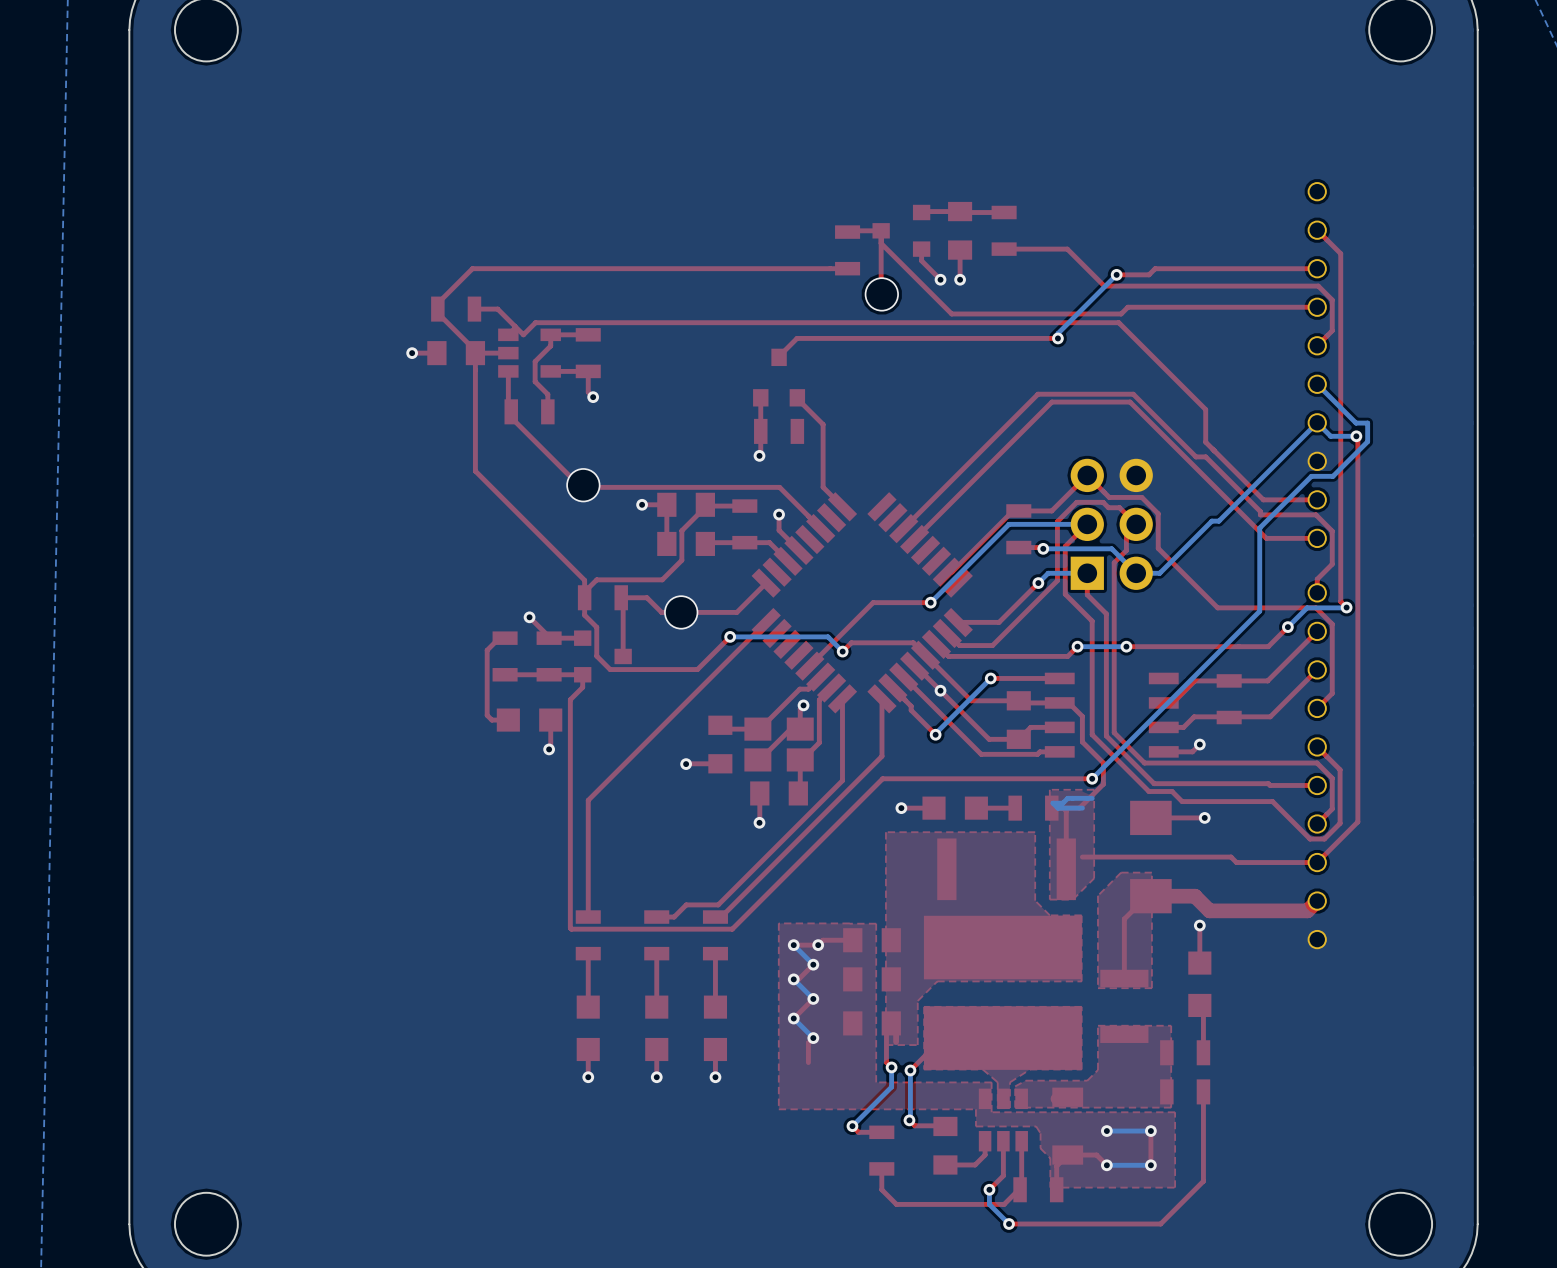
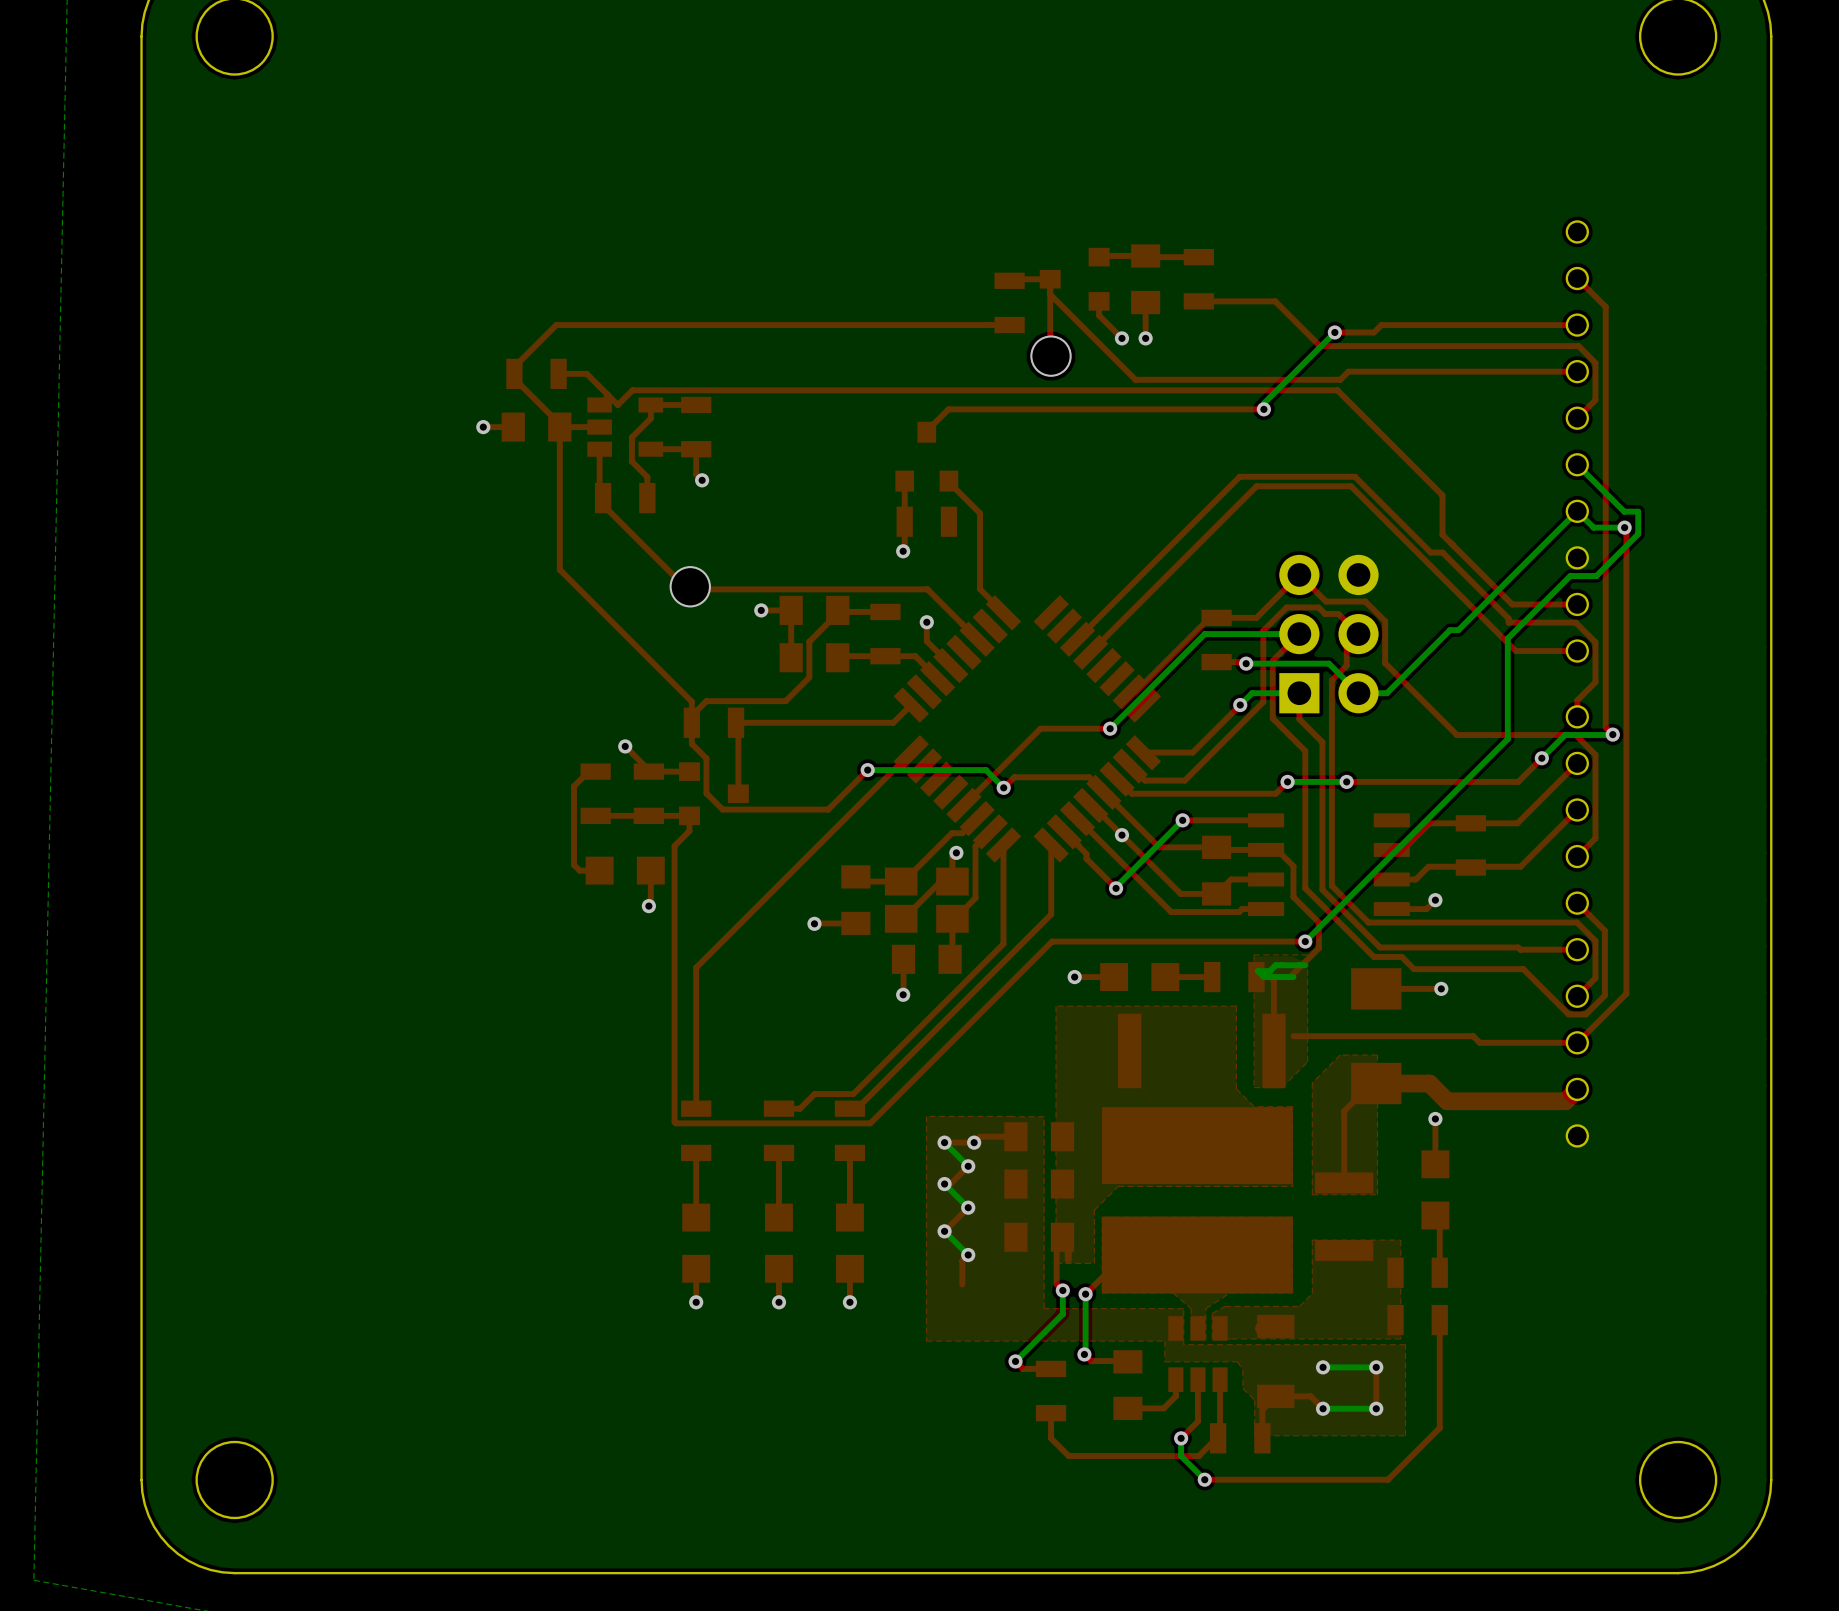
top track: (766, 583) (736, 612) (661, 612) (646, 597) -> (911, 704) (893, 722) (767, 722)
via: (681, 612) -> none

